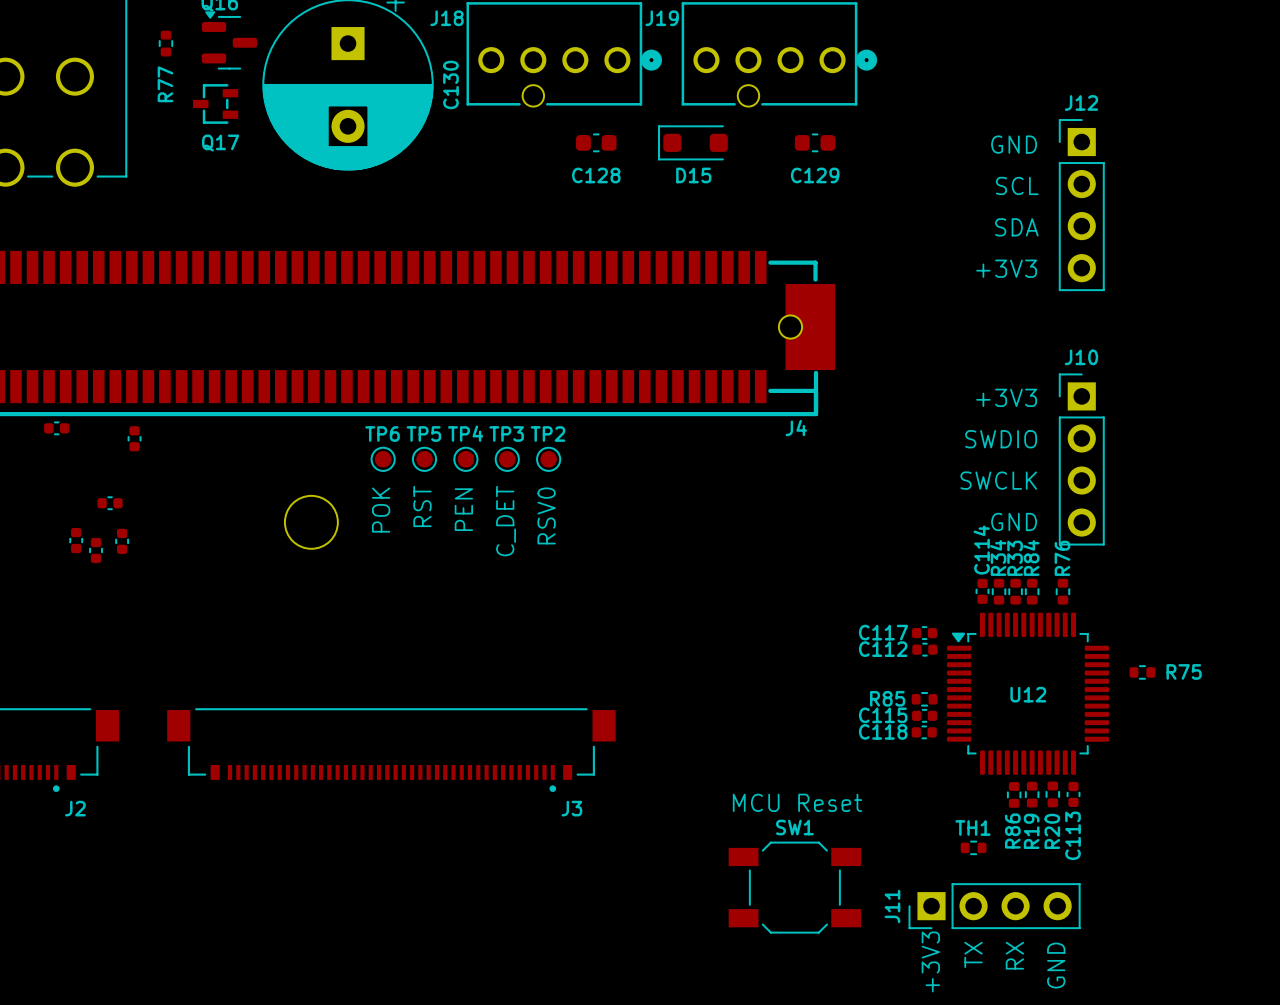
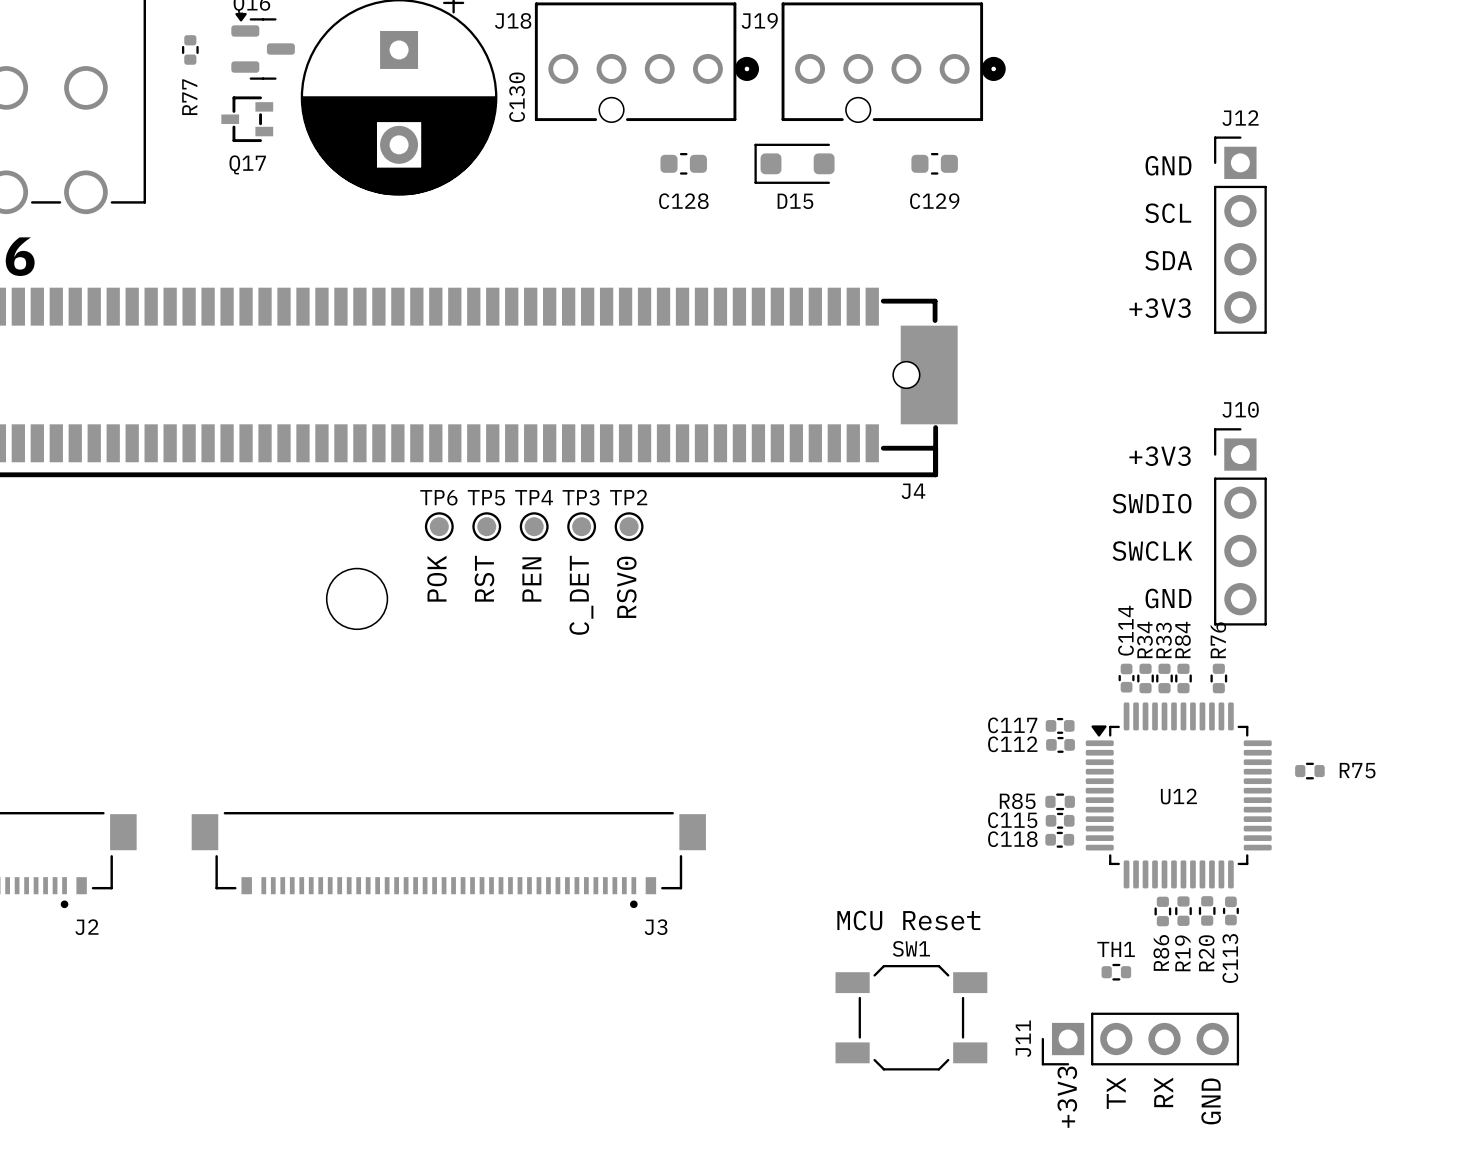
part: (56, 428) -> none
part: (134, 438) -> none
part: (110, 503) -> none
part: (76, 540) -> none
part: (122, 541) -> none
part: (96, 550) -> none

